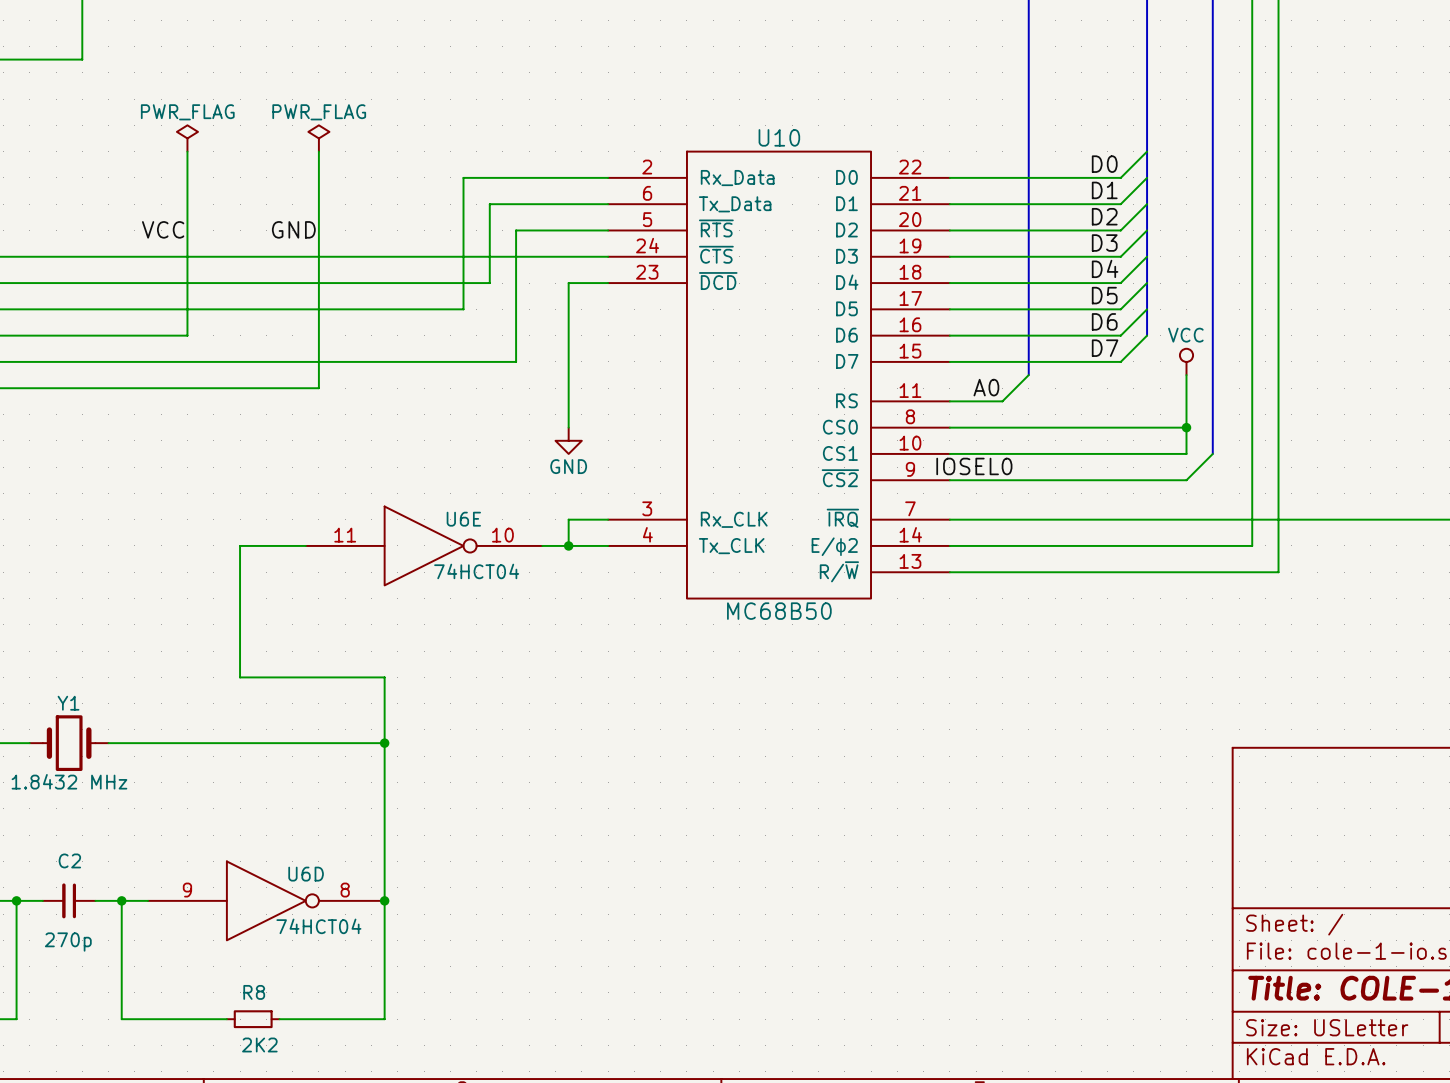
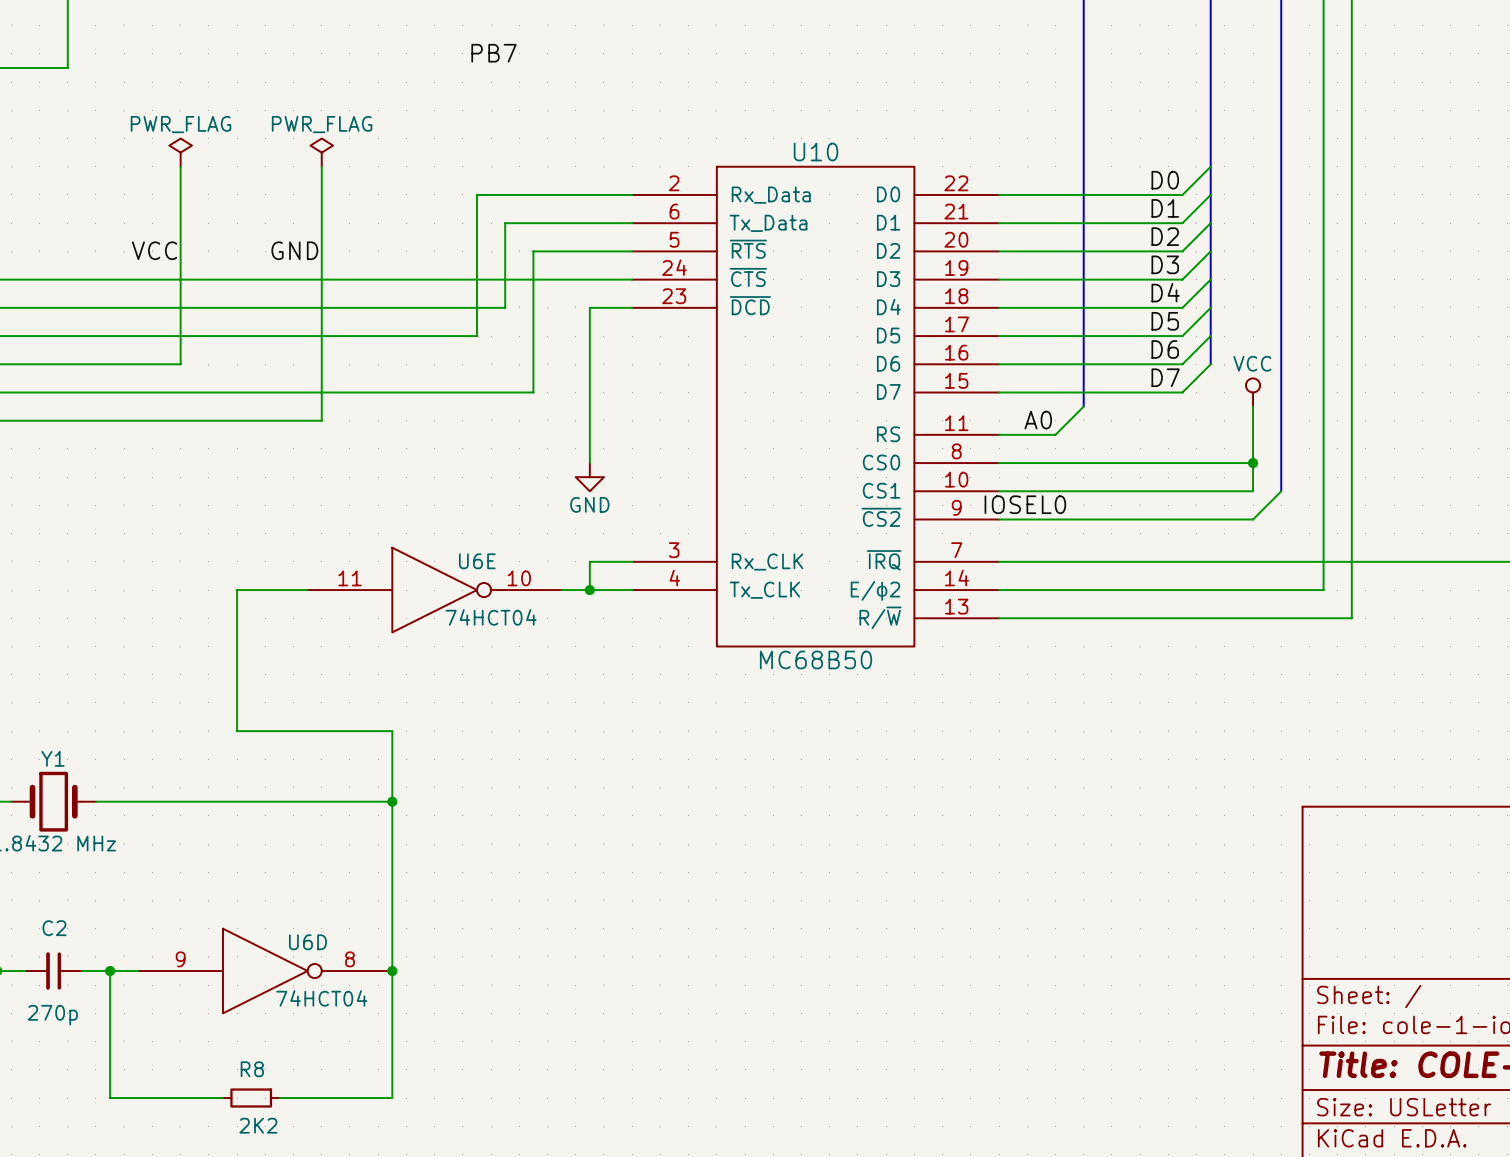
label: none -> PB7 (494, 53)

